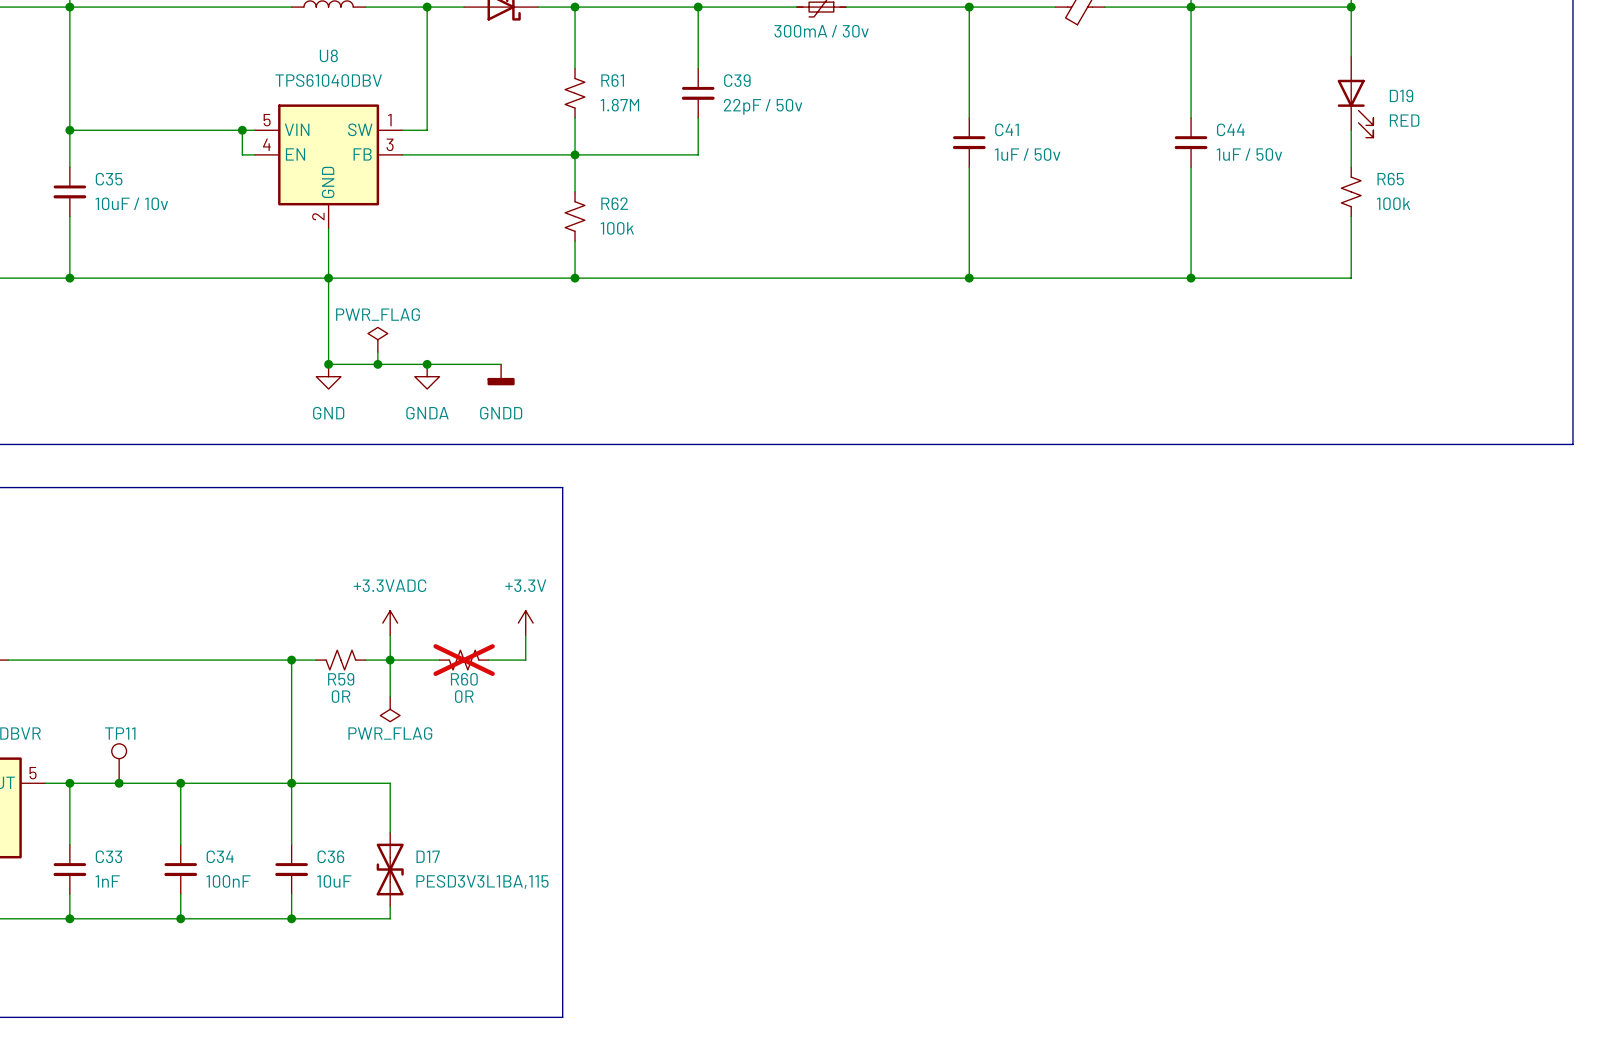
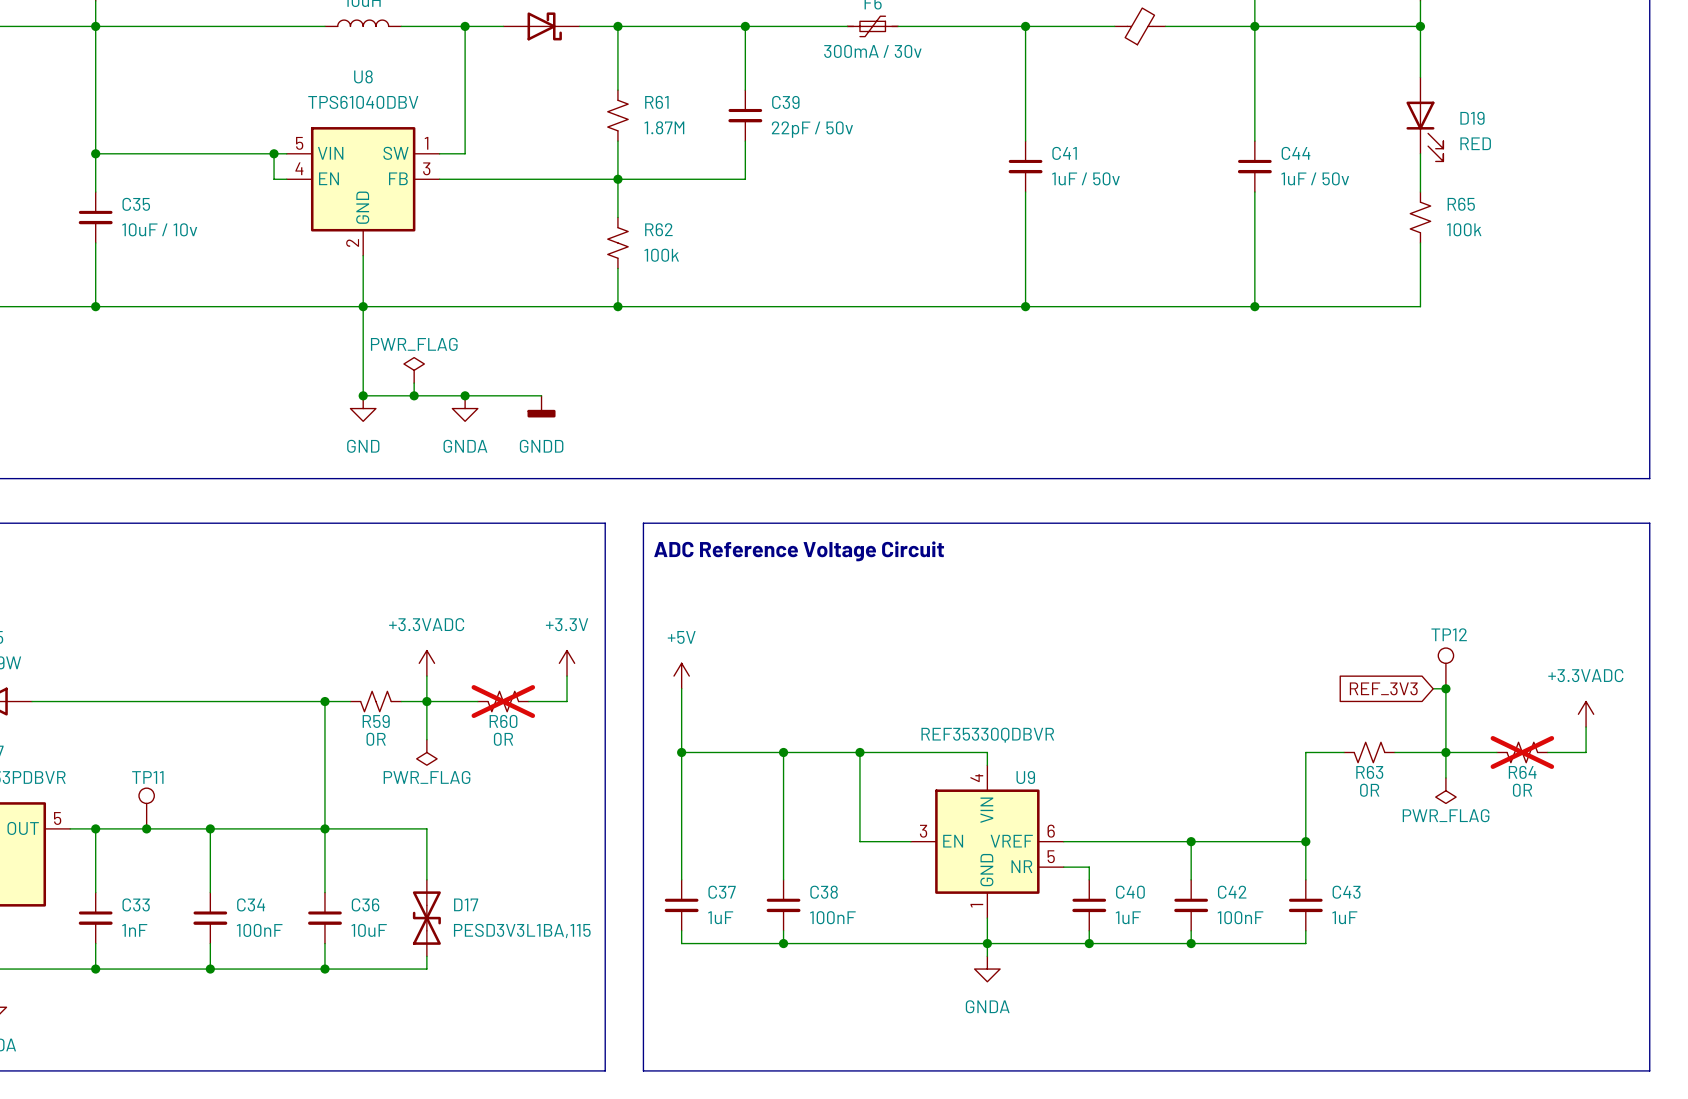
line: none -> (643, 523) (1649, 523) (1649, 1070) (643, 1070) (643, 523)
text: none -> ADC Reference Voltage Circuit (799, 551)
TP12: none -> (1445, 668)
power symbol: none -> +5V (681, 676)
wire: none -> (681, 688) (681, 879)
global label: none -> REF_3V3 (1383, 688)
wire: none -> (1433, 688) (1445, 688) (1445, 777)
junction: none -> (1445, 688)
power symbol: none -> +3.3VADC (1586, 714)
wire: none -> (1586, 727) (1586, 752) (1547, 752)
wire: none -> (681, 752) (987, 752) (987, 765)
junction: none -> (681, 752)
wire: none -> (783, 752) (783, 879)
junction: none -> (783, 752)
wire: none -> (859, 752) (859, 841) (910, 841)
junction: none -> (859, 752)
wire: none -> (1344, 752) (1305, 752) (1305, 879)
R63: none -> 0R (1369, 752)
wire: none -> (1394, 752) (1496, 752)
junction: none -> (1445, 752)
R64: none -> 0R (1522, 752)
power symbol: none -> PWR_FLAG (1445, 790)
U9: none -> REF35330QDBVR (987, 841)
wire: none -> (1063, 841) (1305, 841)
wire: none -> (1191, 841) (1191, 879)
junction: none -> (1191, 841)
junction: none -> (1305, 841)
wire: none -> (1063, 867) (1089, 867) (1089, 879)
C37: none -> 1uF (681, 905)
C38: none -> 100nF (783, 905)
C40: none -> 1uF (1089, 905)
C42: none -> 100nF (1191, 905)
C43: none -> 1uF (1305, 905)
wire: none -> (987, 918) (987, 956)
wire: none -> (681, 930) (681, 943) (1305, 943) (1305, 930)
wire: none -> (783, 930) (783, 943)
wire: none -> (1089, 930) (1089, 943)
wire: none -> (1191, 930) (1191, 943)
junction: none -> (783, 943)
junction: none -> (987, 943)
junction: none -> (1089, 943)
junction: none -> (1191, 943)
power symbol: none -> GNDA (987, 969)

